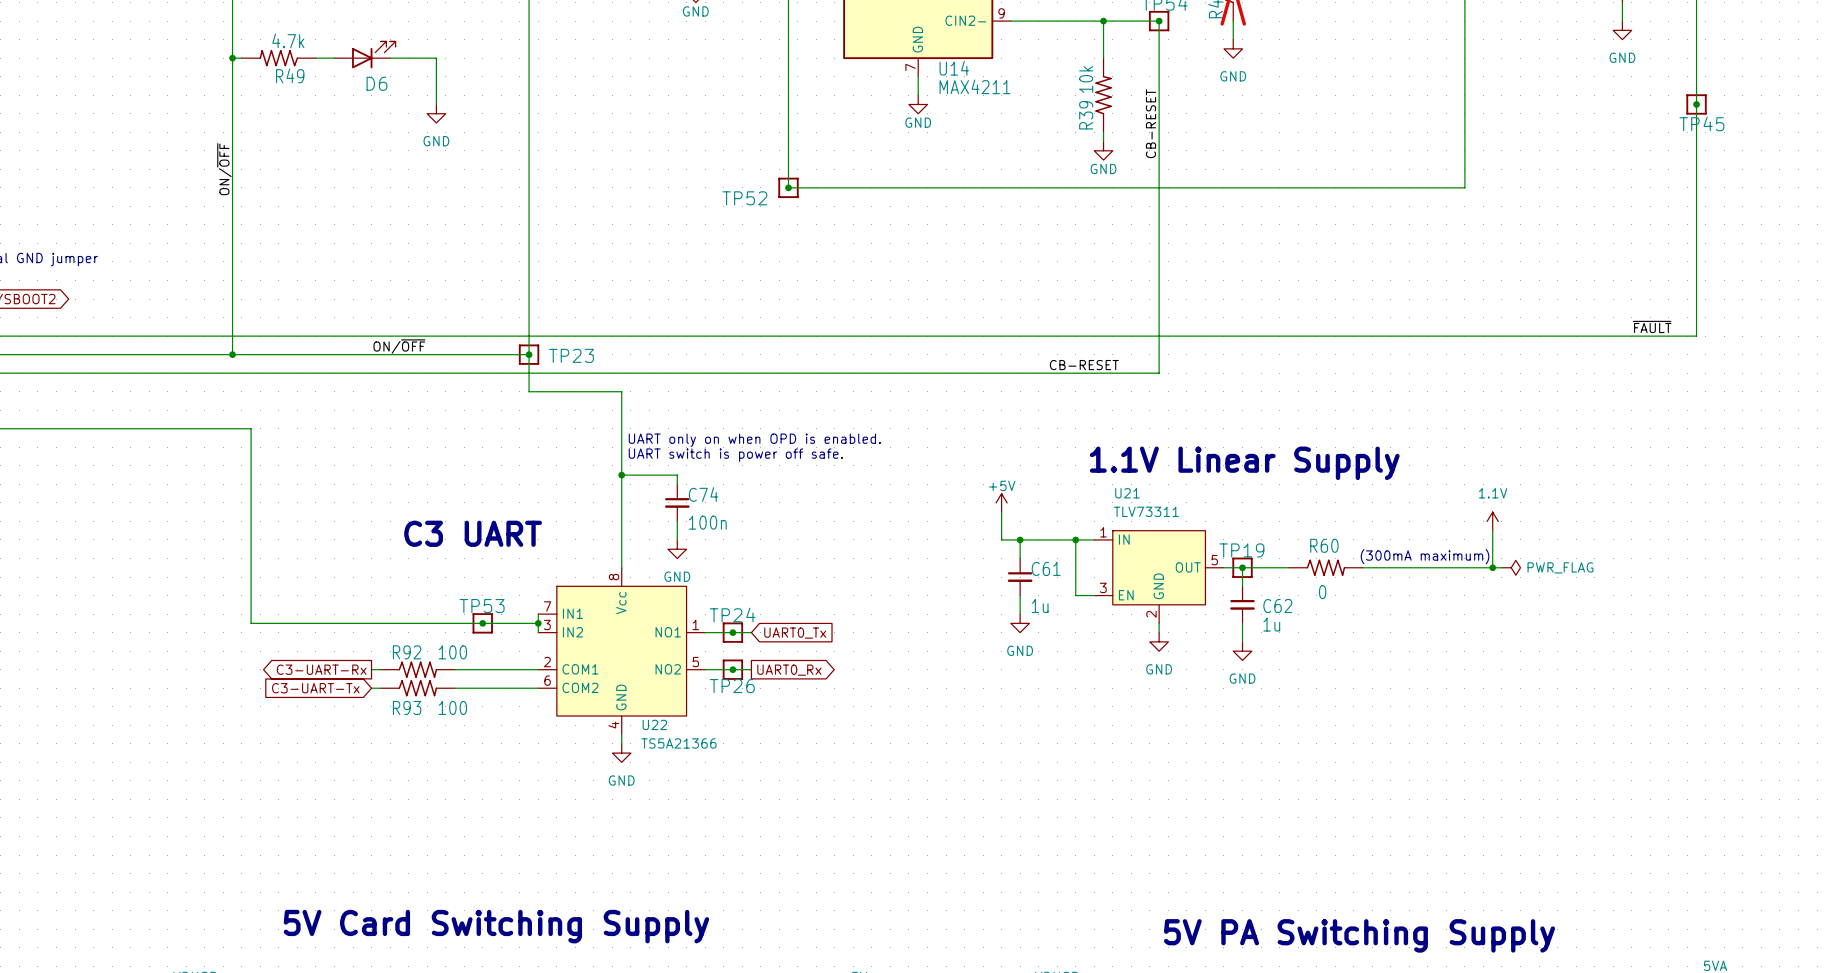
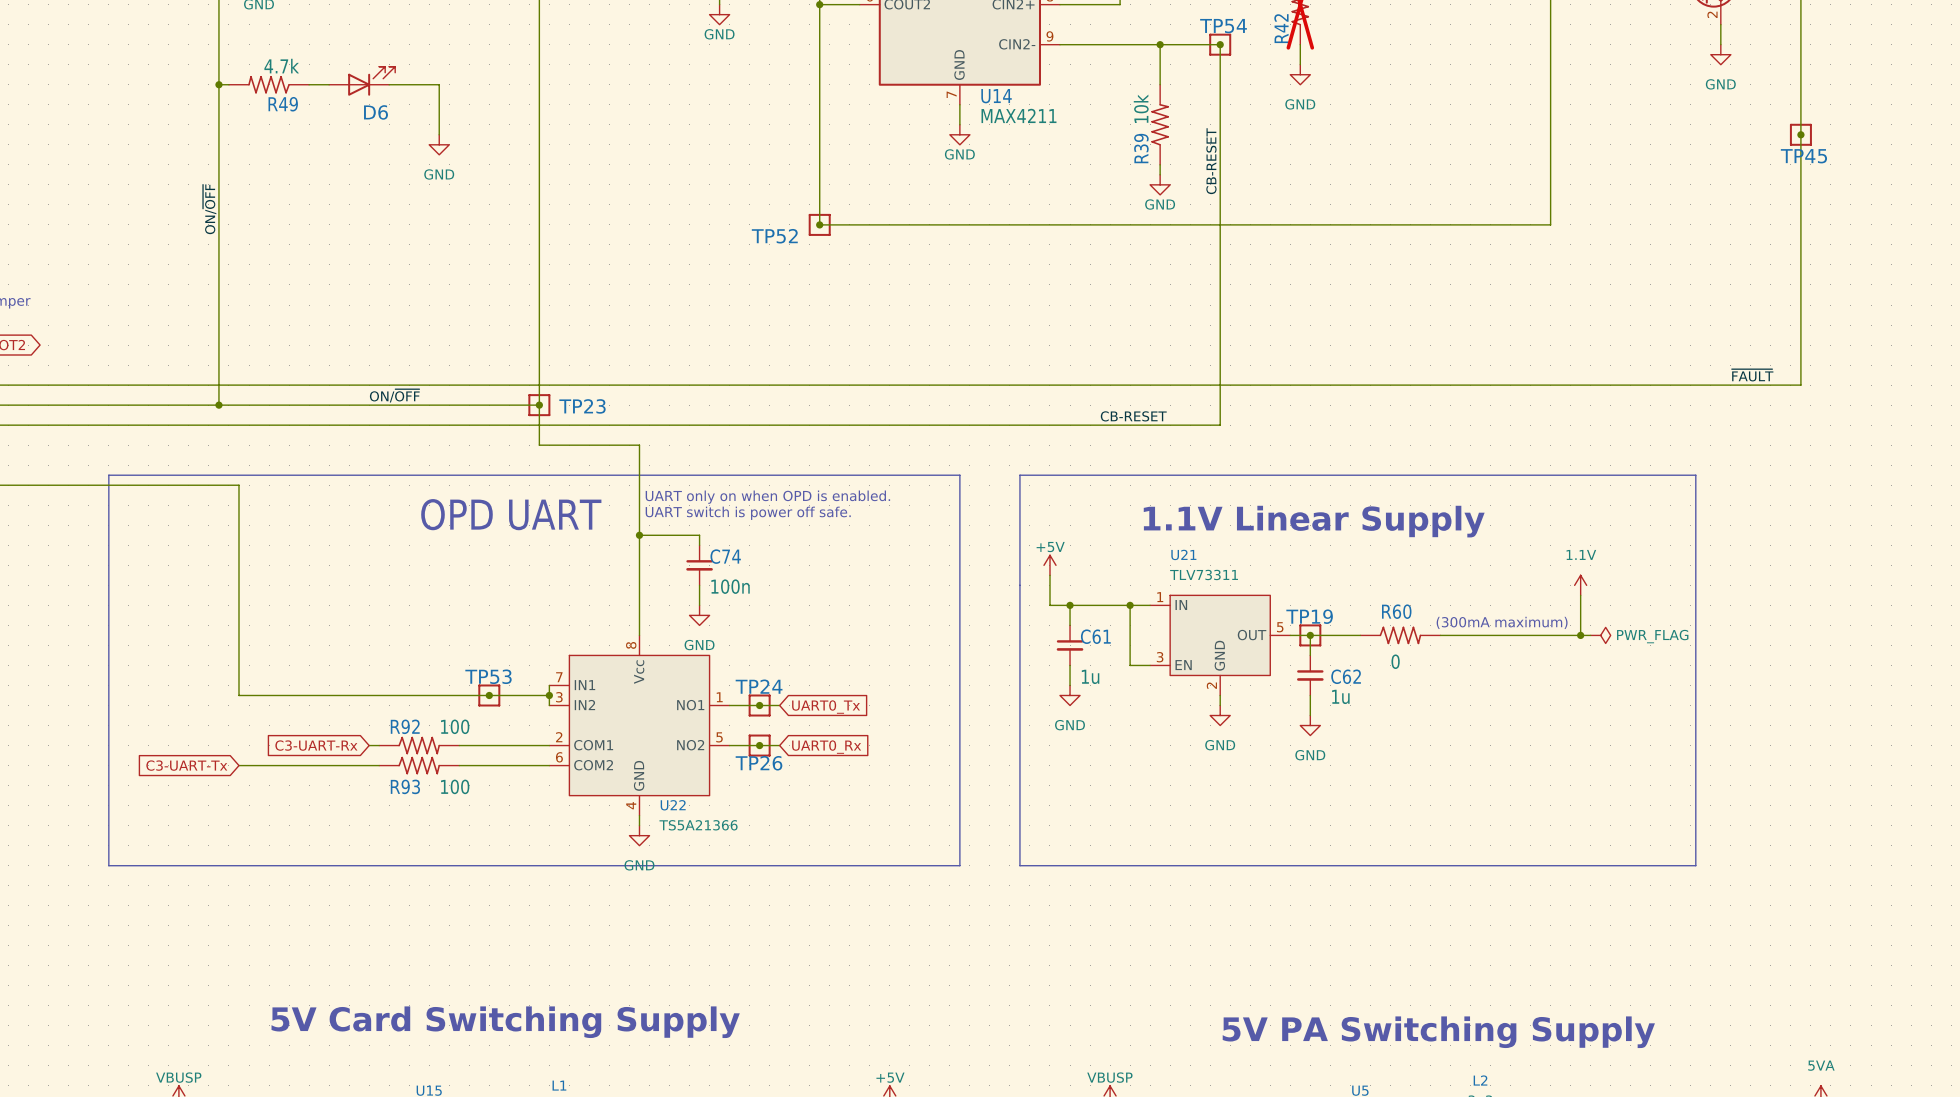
line: none -> (108, 475) (959, 475) (959, 865) (108, 865) (108, 475)
line: none -> (1019, 475) (1695, 475) (1695, 865) (1019, 865) (1019, 475)
text: none -> OPD UART (511, 514)
text: C3 UART (473, 533) -> none
global label shape: output (321, 669) -> input (316, 745)
global label shape: output (789, 670) -> input (826, 747)
wire: none -> (238, 765) (369, 765)
global label position: C3-UART-Tx (315, 688) -> C3-UART-Tx (186, 765)

